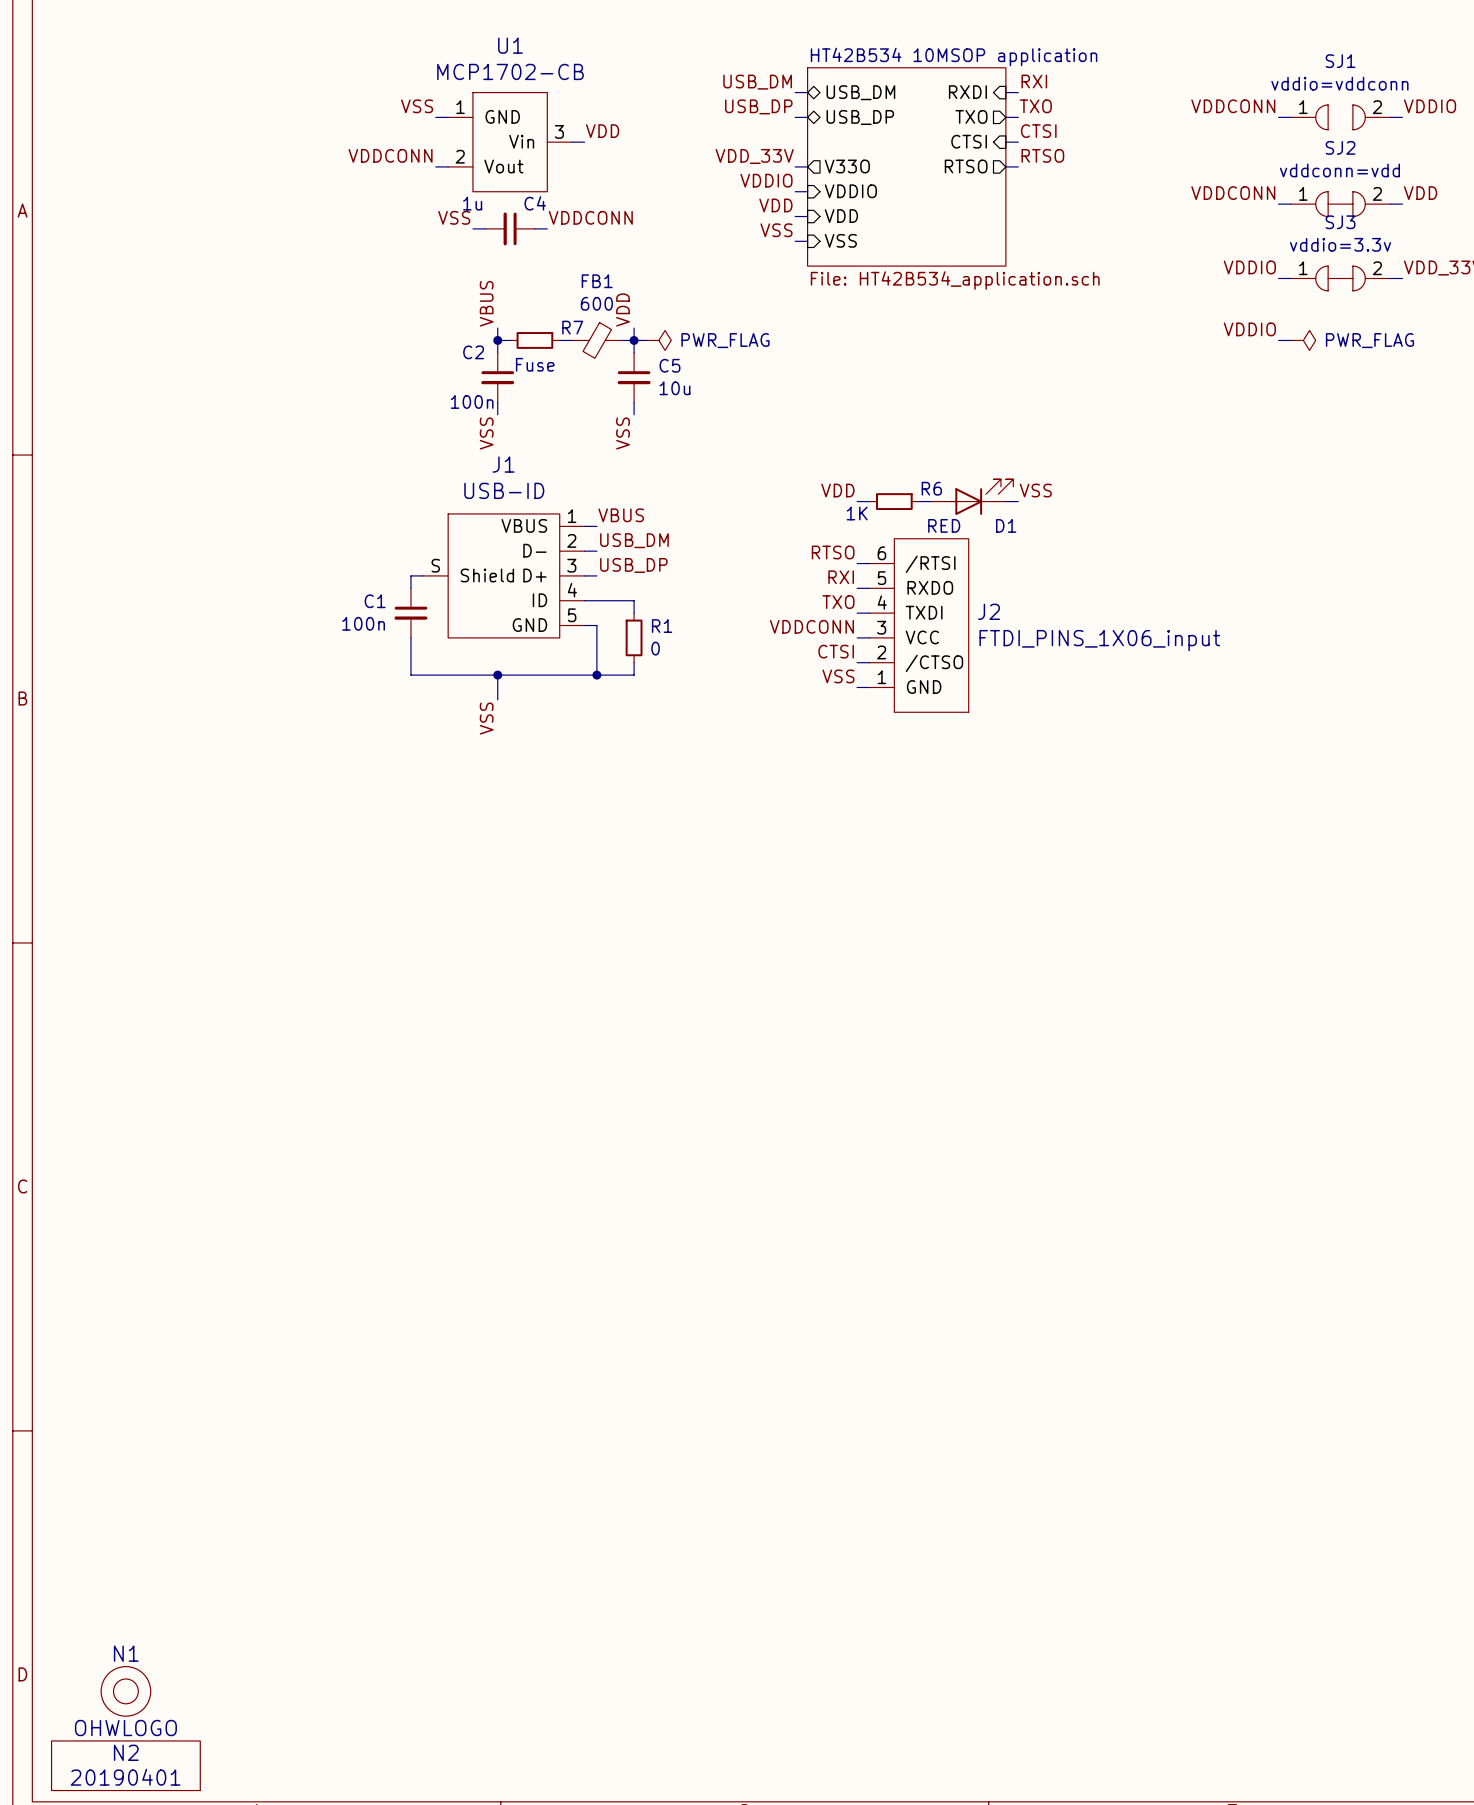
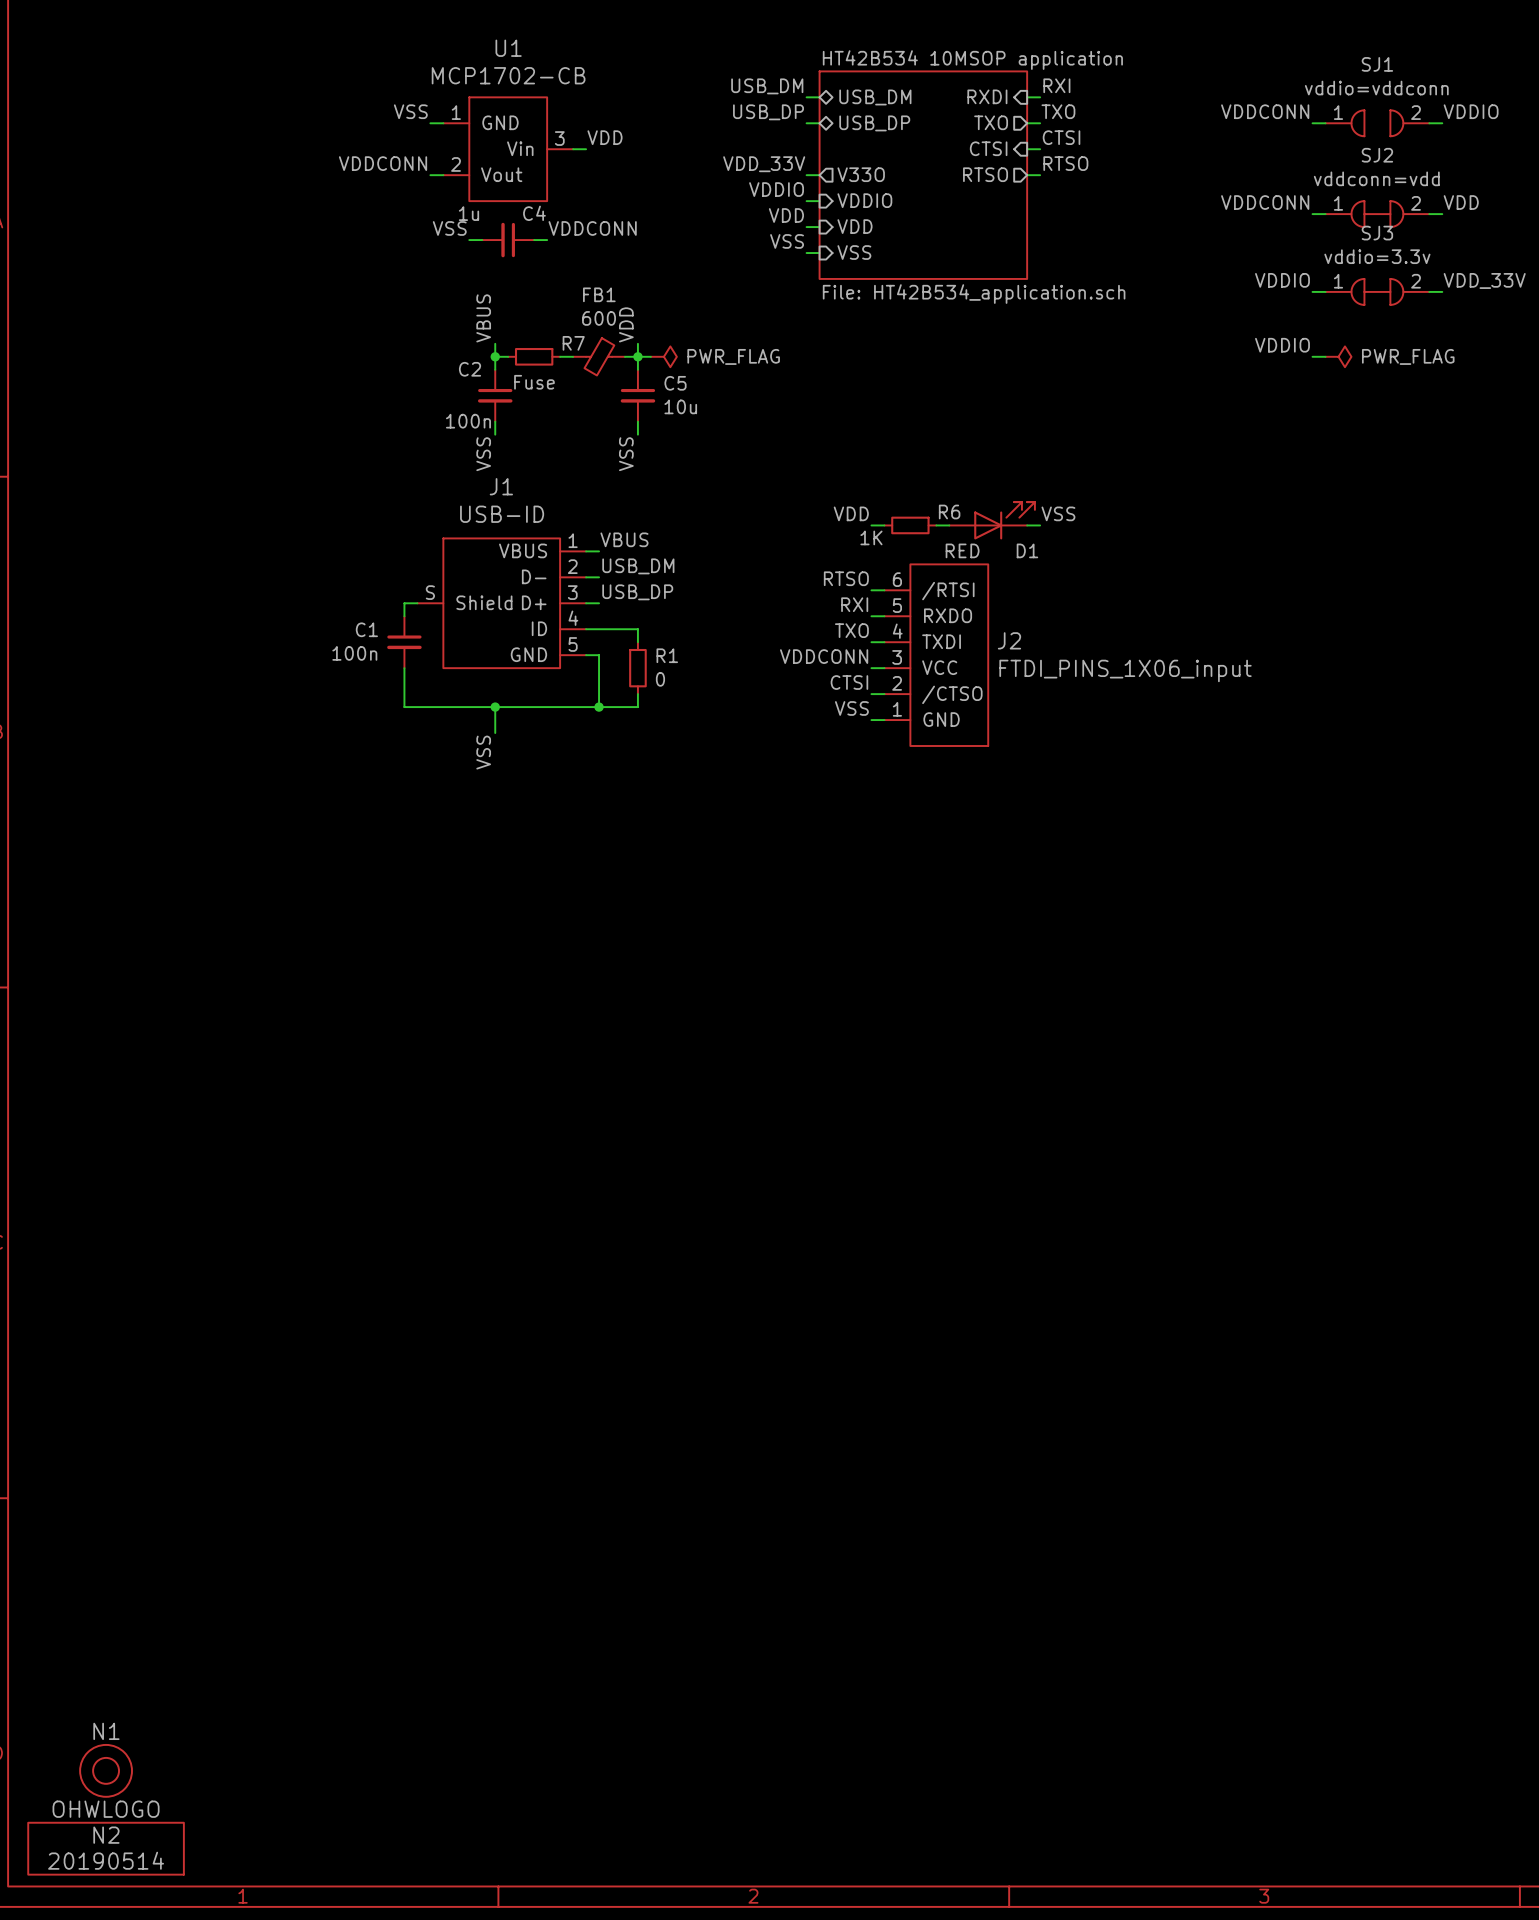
N2 value: 20190401 (125, 1777) -> 20190514 (106, 1860)

